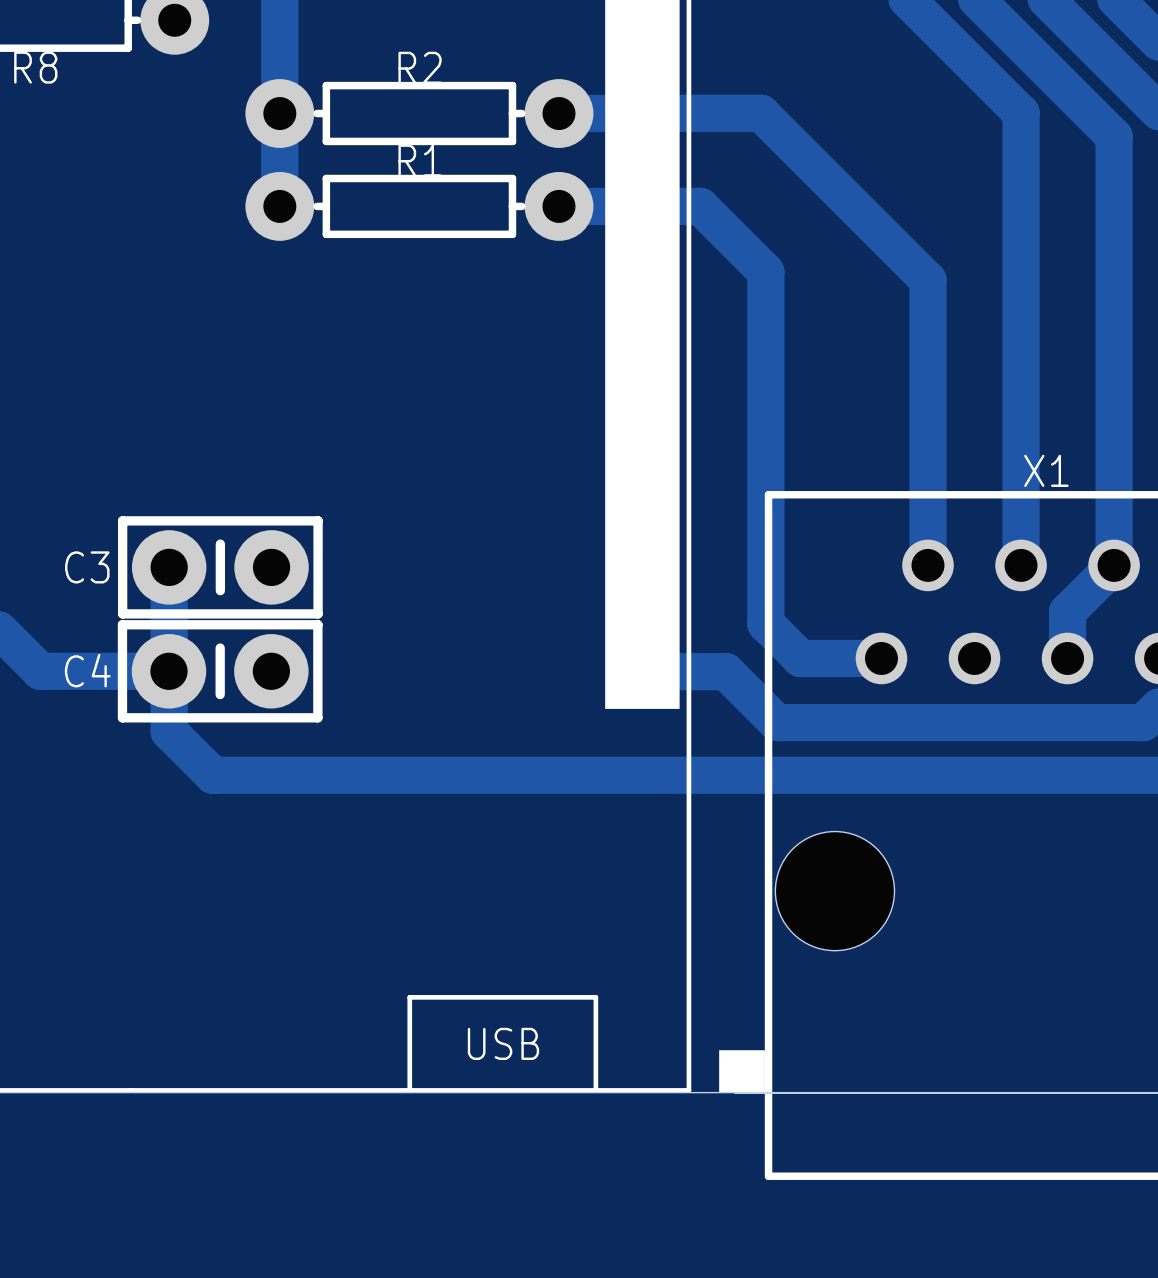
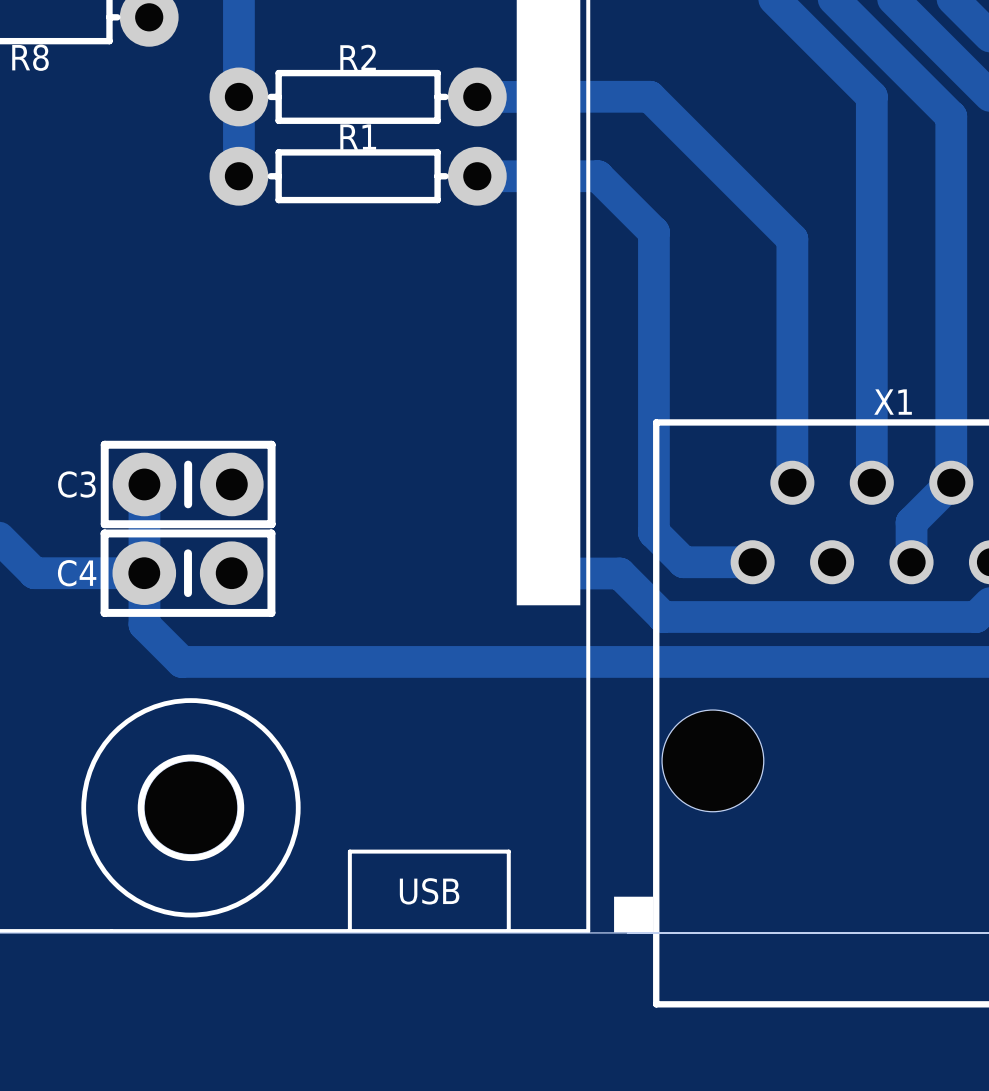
part: none -> (190, 807)

